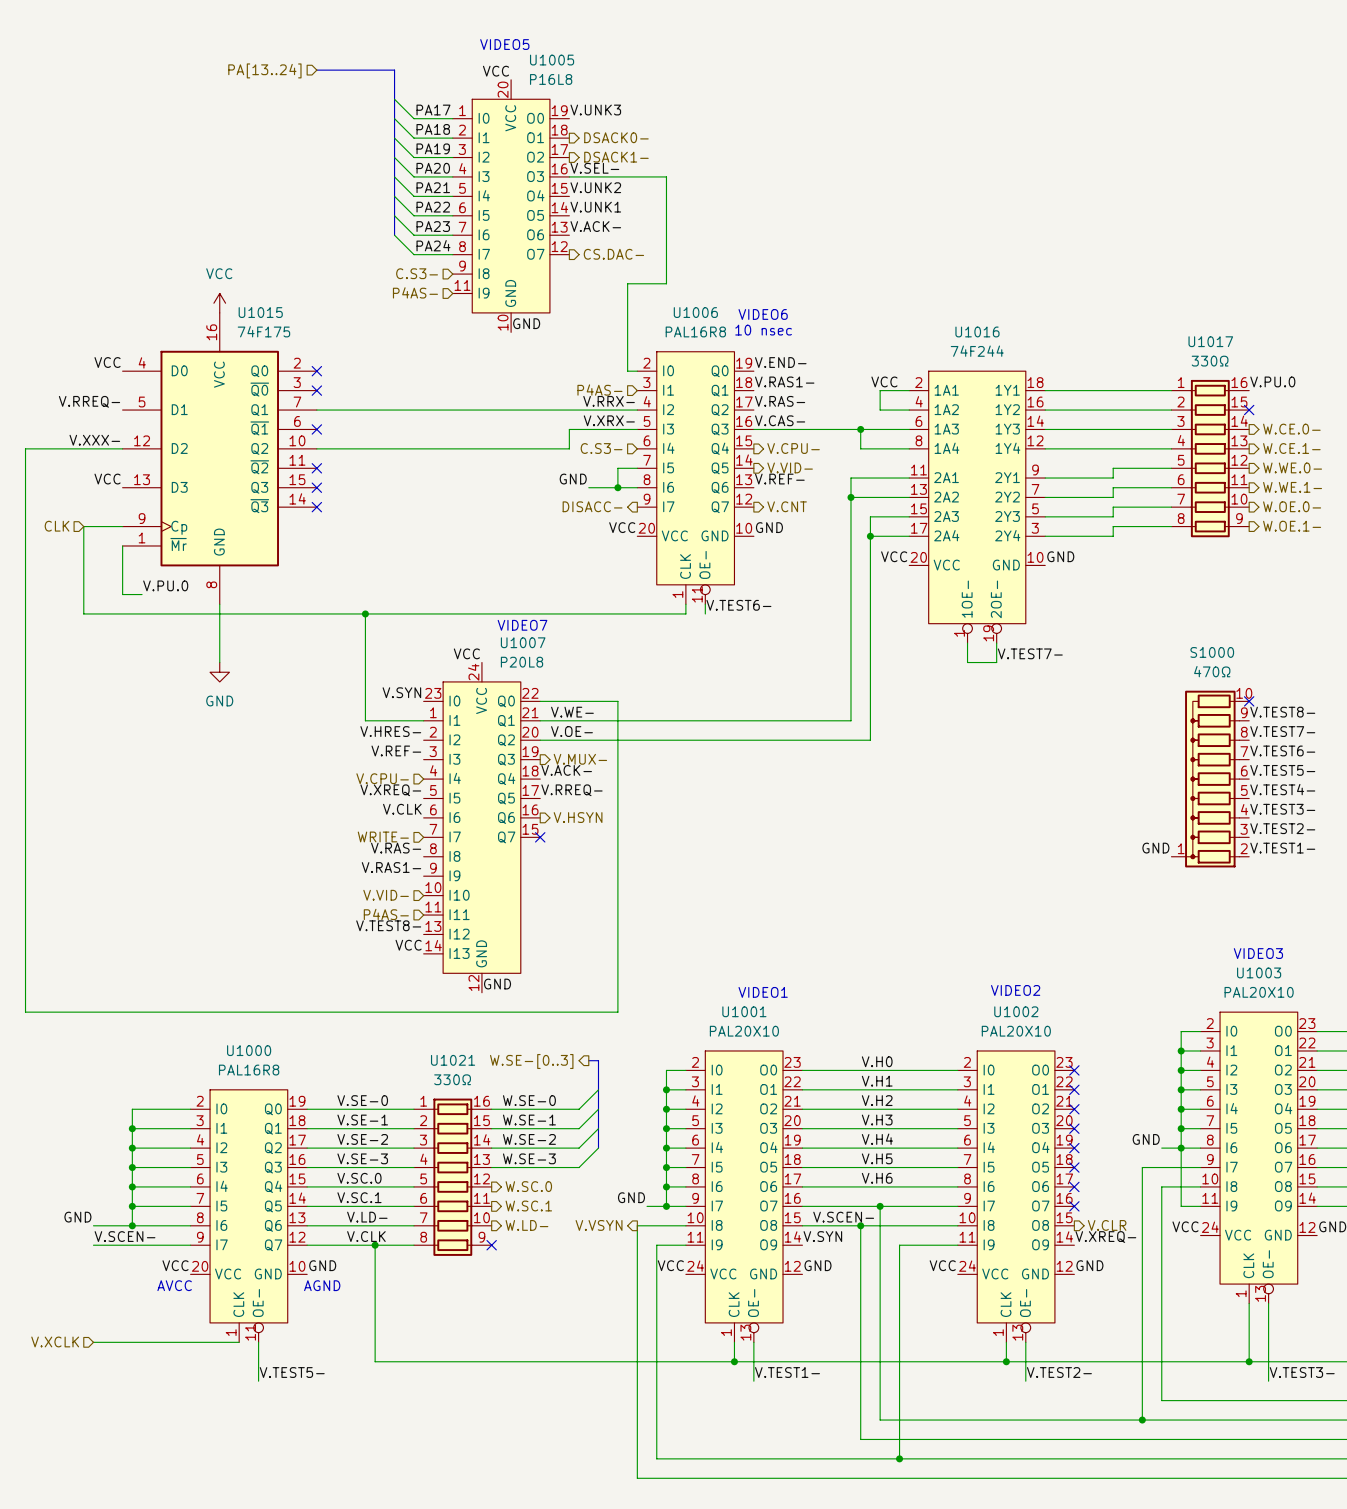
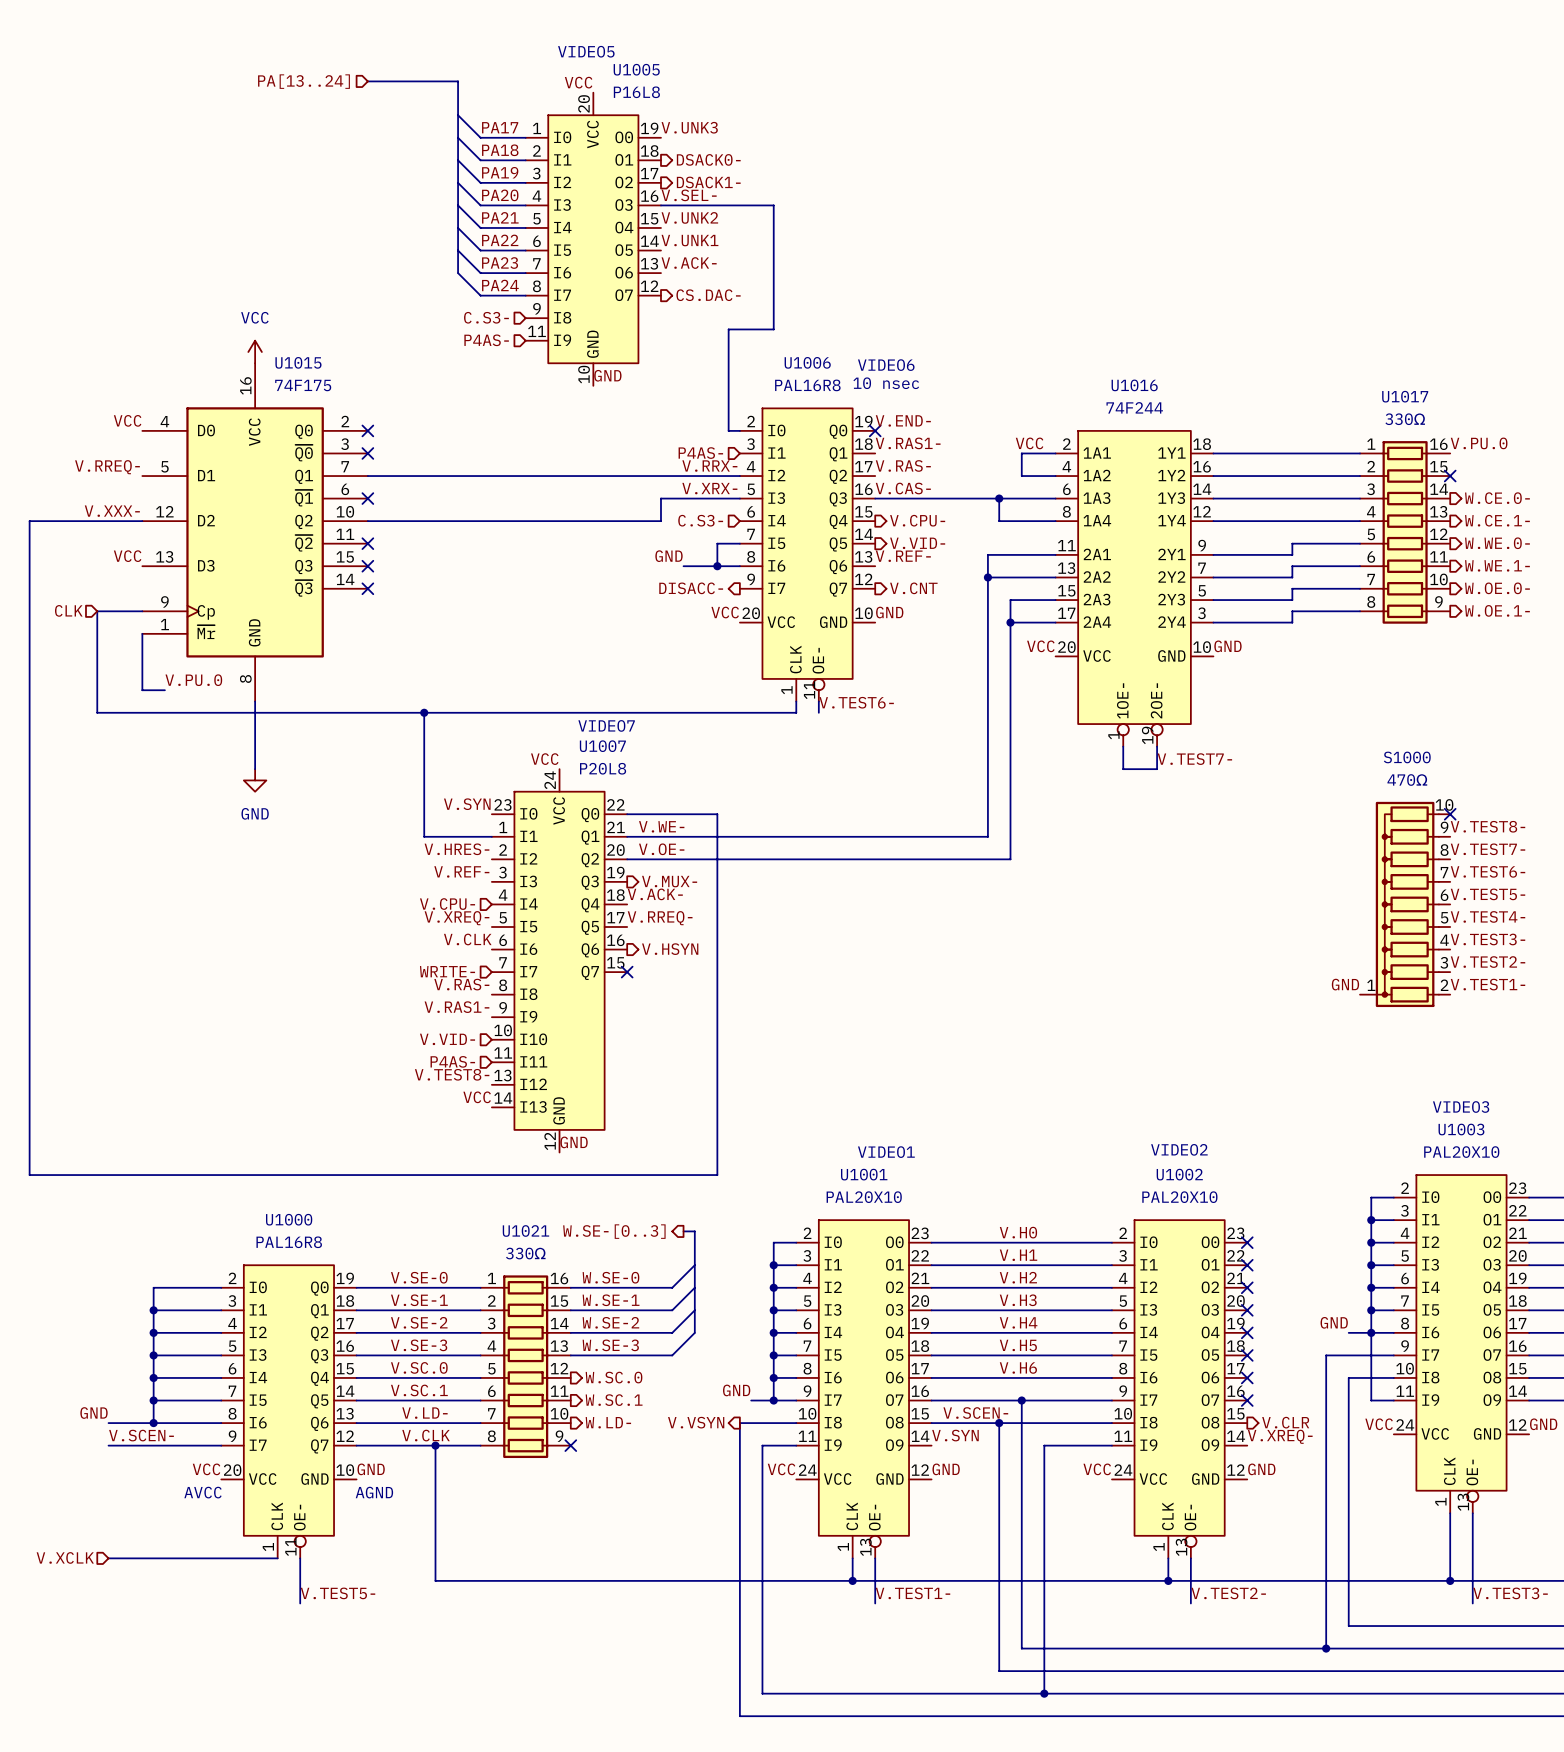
no-connect mark: none -> (875, 430)

